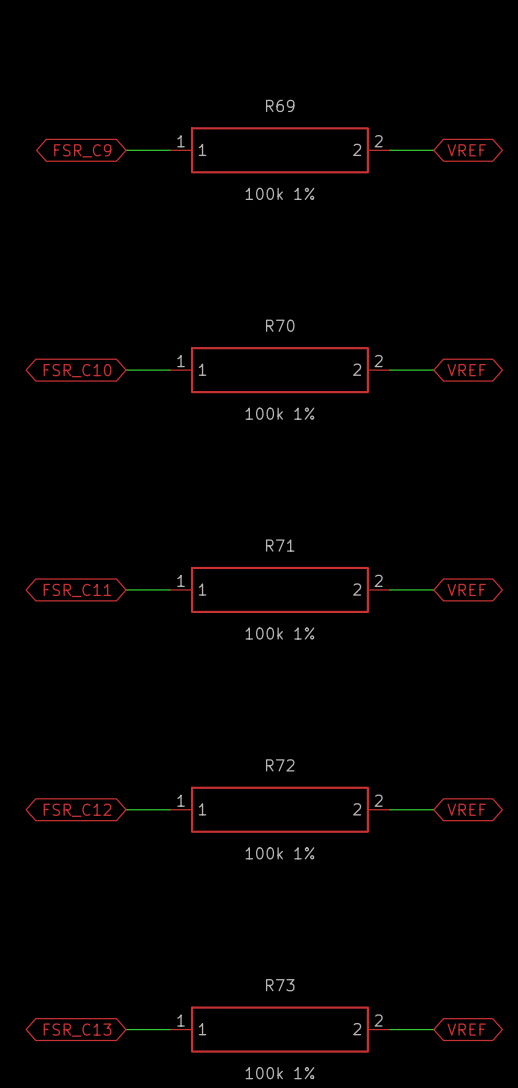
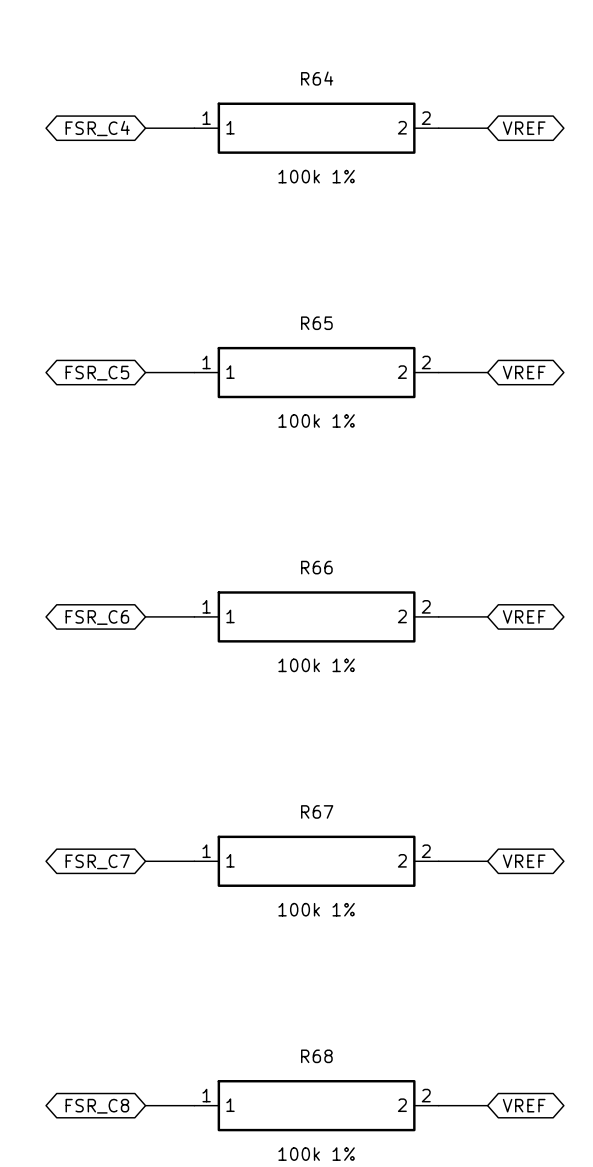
R69 name: R69 (280, 105) -> R64 (317, 78)
global label: FSR_C9 (82, 150) -> FSR_C4 (97, 128)
R70 name: R70 (280, 325) -> R65 (316, 323)
global label: FSR_C10 (77, 370) -> FSR_C5 (97, 373)
R71 name: R71 (280, 545) -> R66 (316, 567)
global label: FSR_C11 (77, 590) -> FSR_C6 (97, 617)
R72 name: R72 (280, 765) -> R67 (317, 811)
global label: FSR_C12 (77, 810) -> FSR_C7 (97, 861)
R73 name: R73 (280, 985) -> R68 (316, 1056)
global label: FSR_C13 (77, 1030) -> FSR_C8 (97, 1106)

